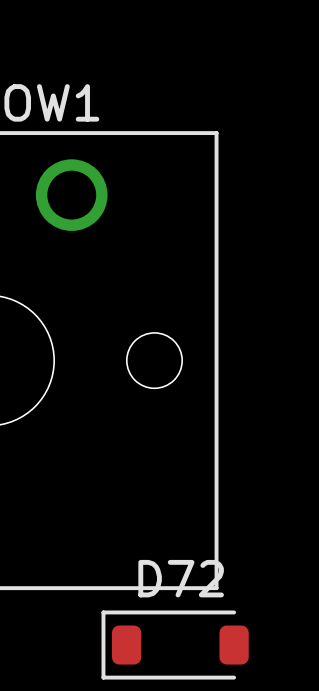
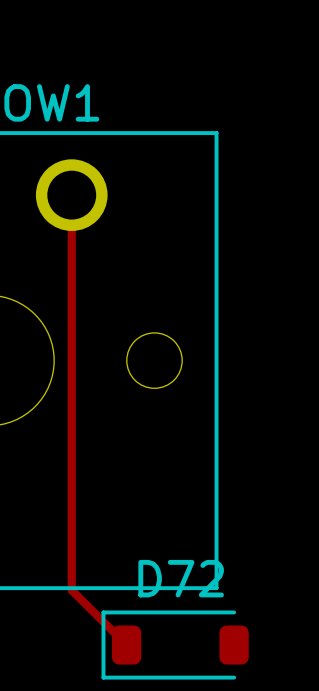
top track: none -> (71, 195) (71, 590) (126, 645)

